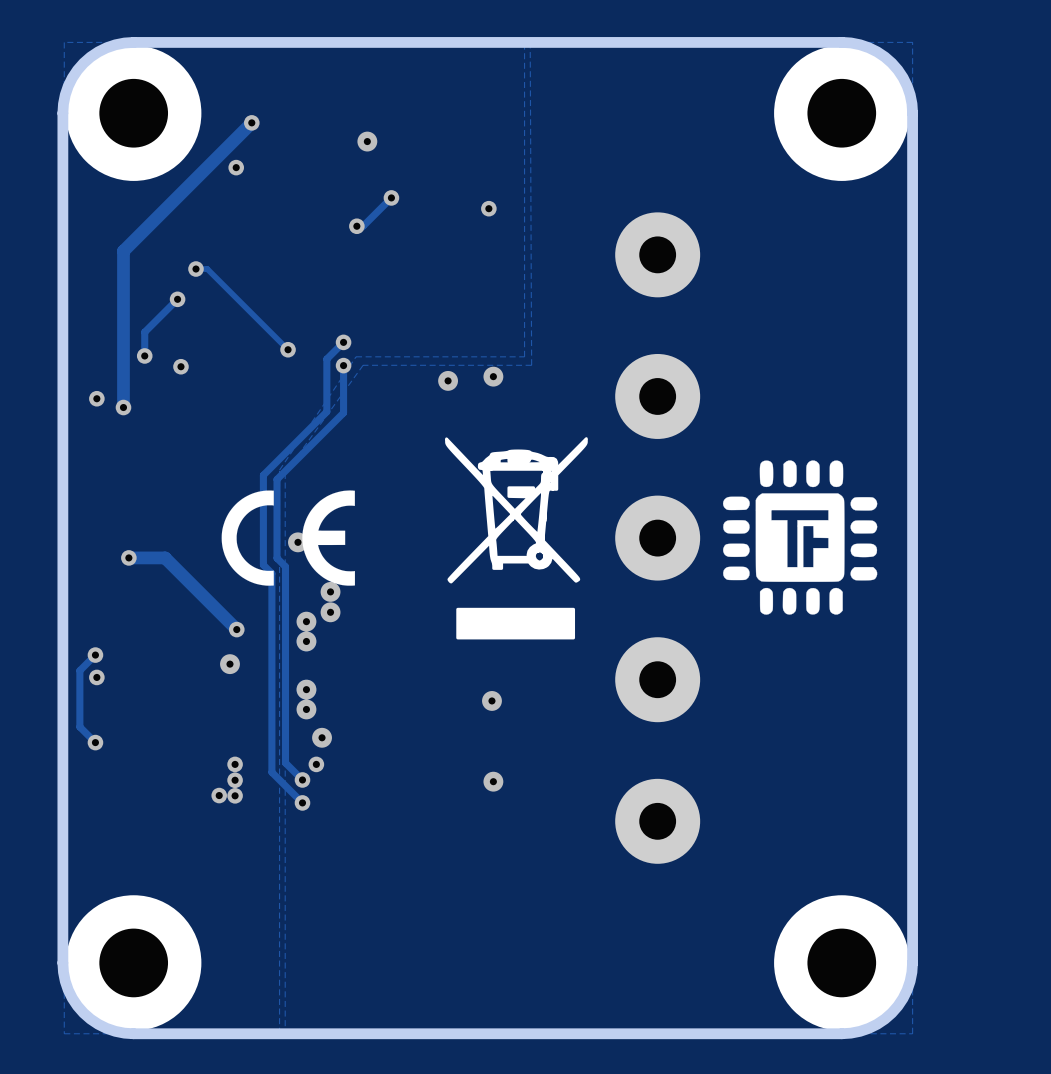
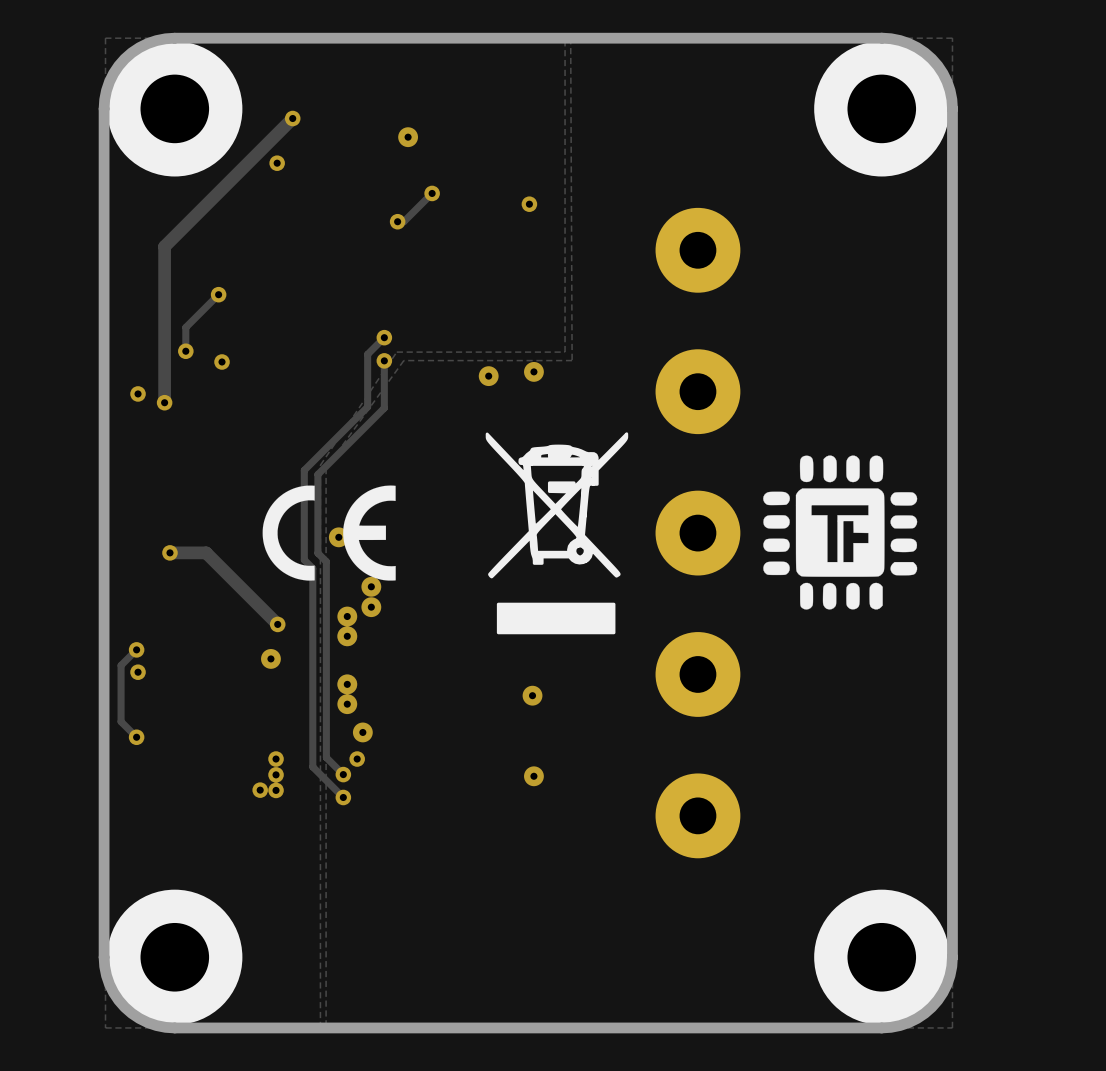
track: (195, 269) (207, 269) (288, 349) -> none
via: (195, 269) -> none
via: (288, 349) -> none

